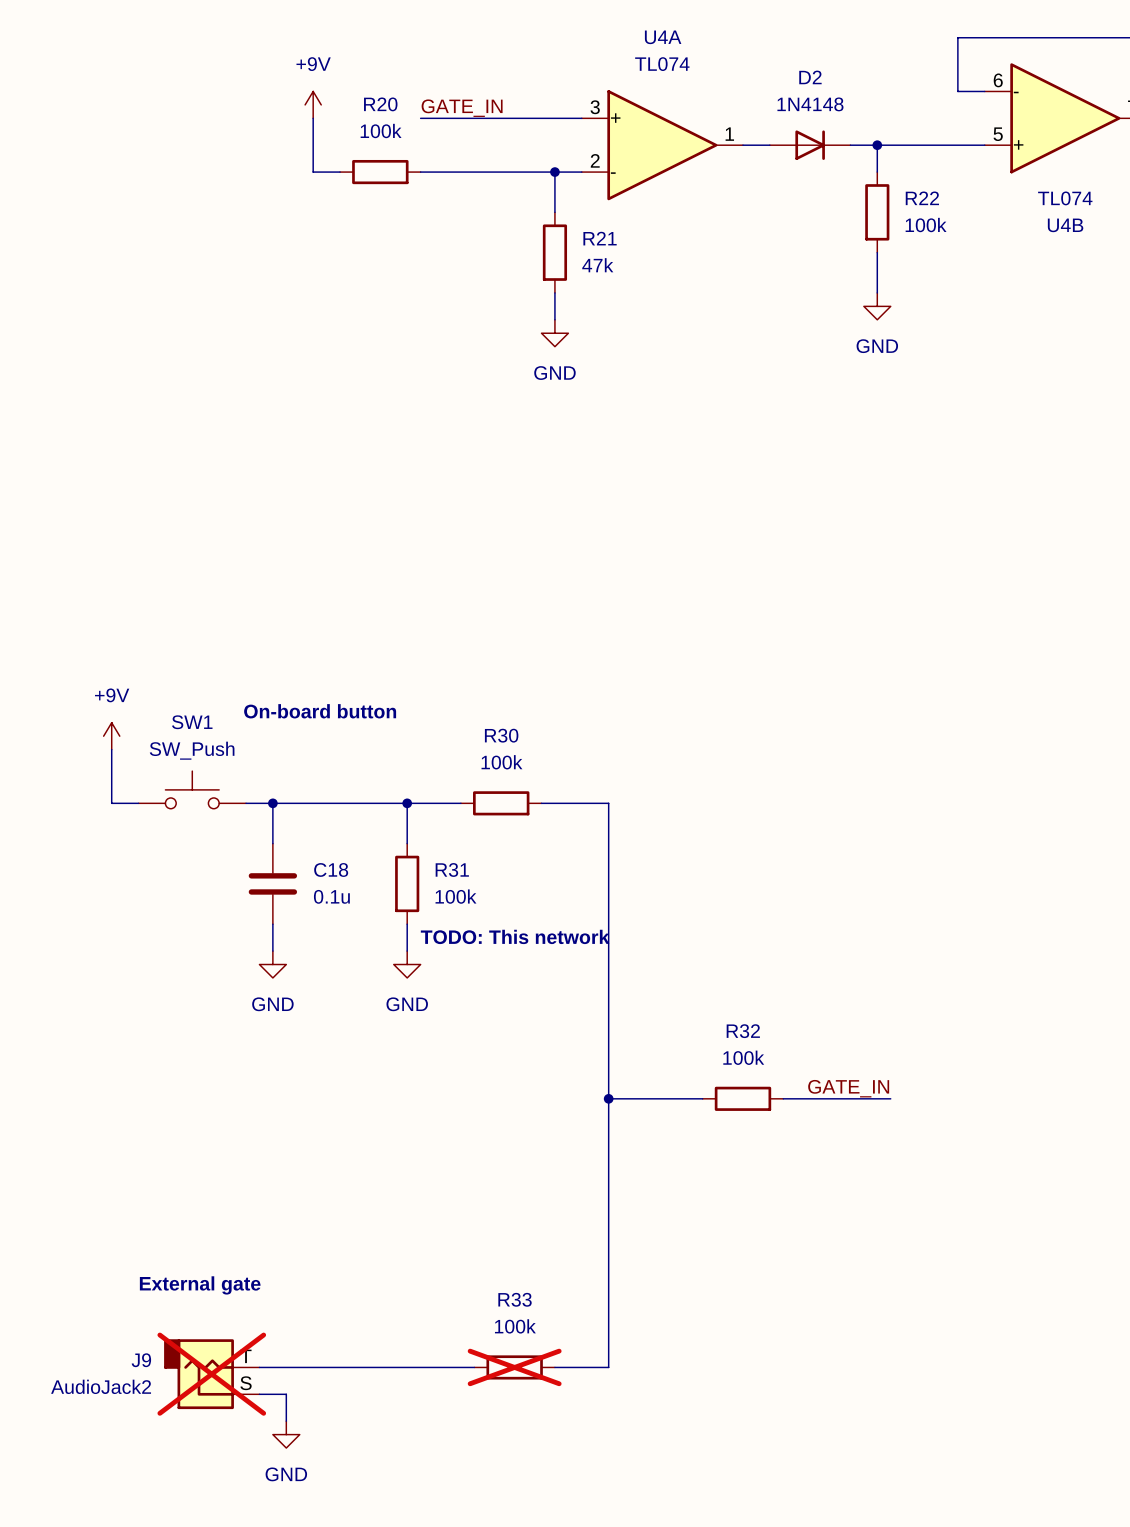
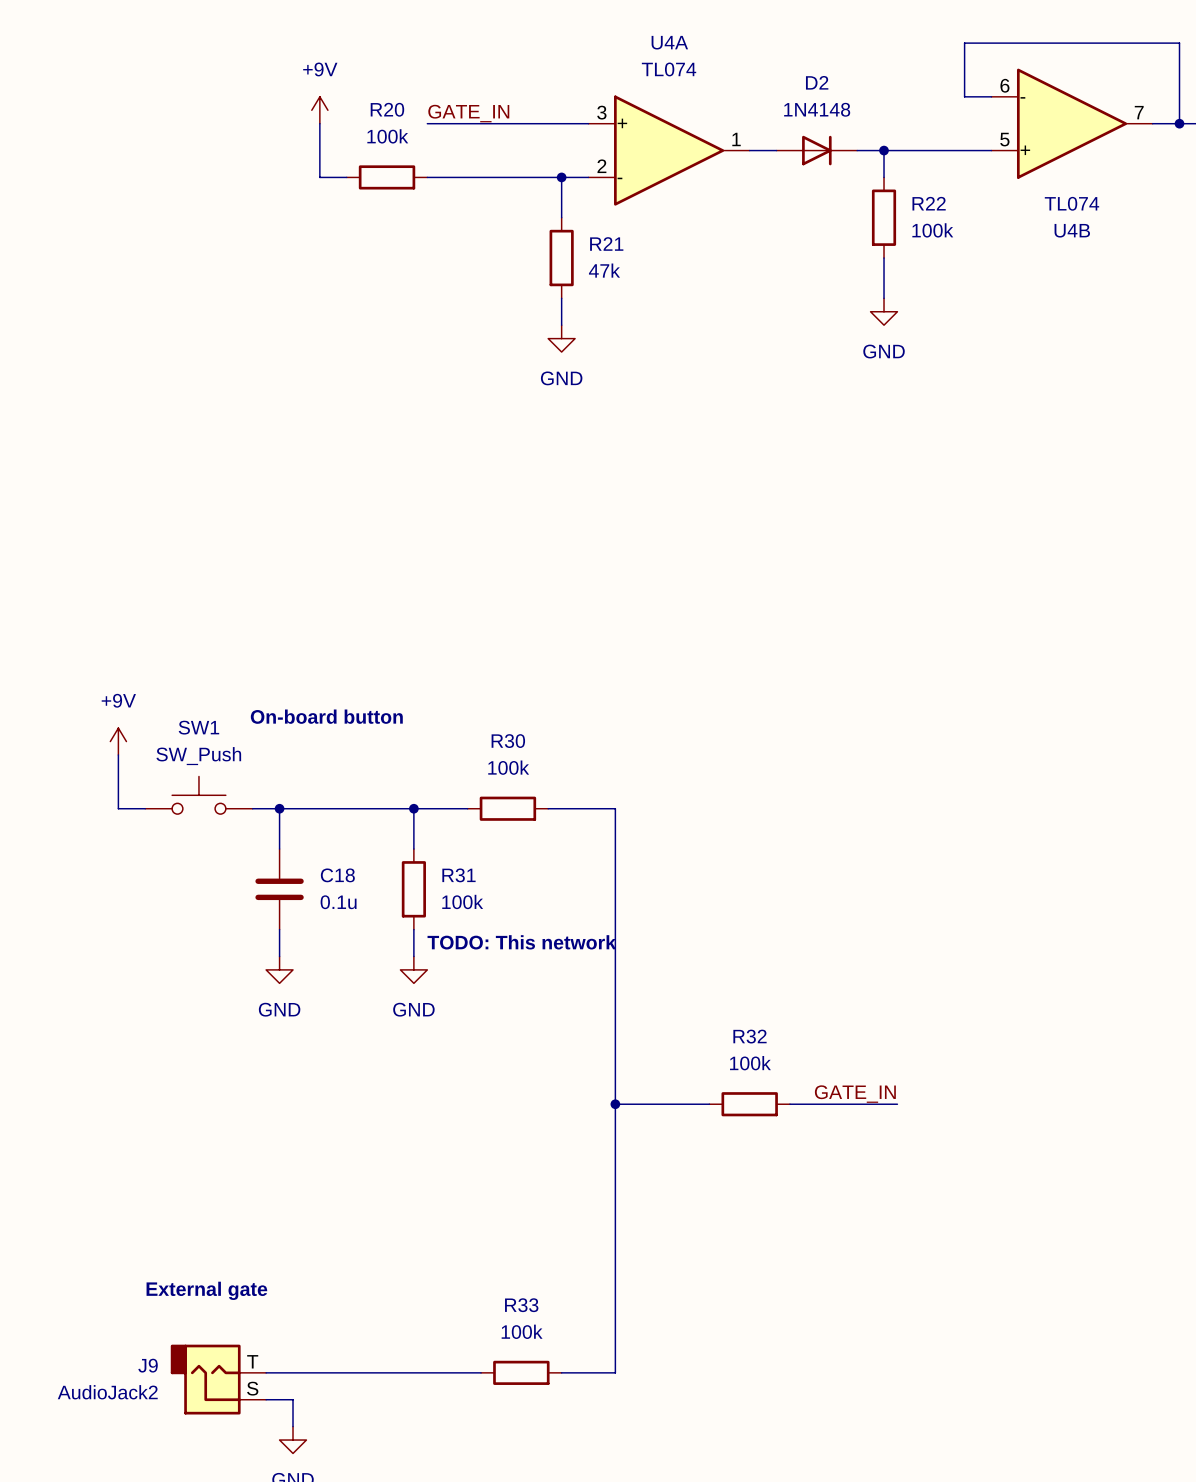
R33 do-not-place cross: (514, 1367) -> none
J9 do-not-place cross: (211, 1374) -> none

